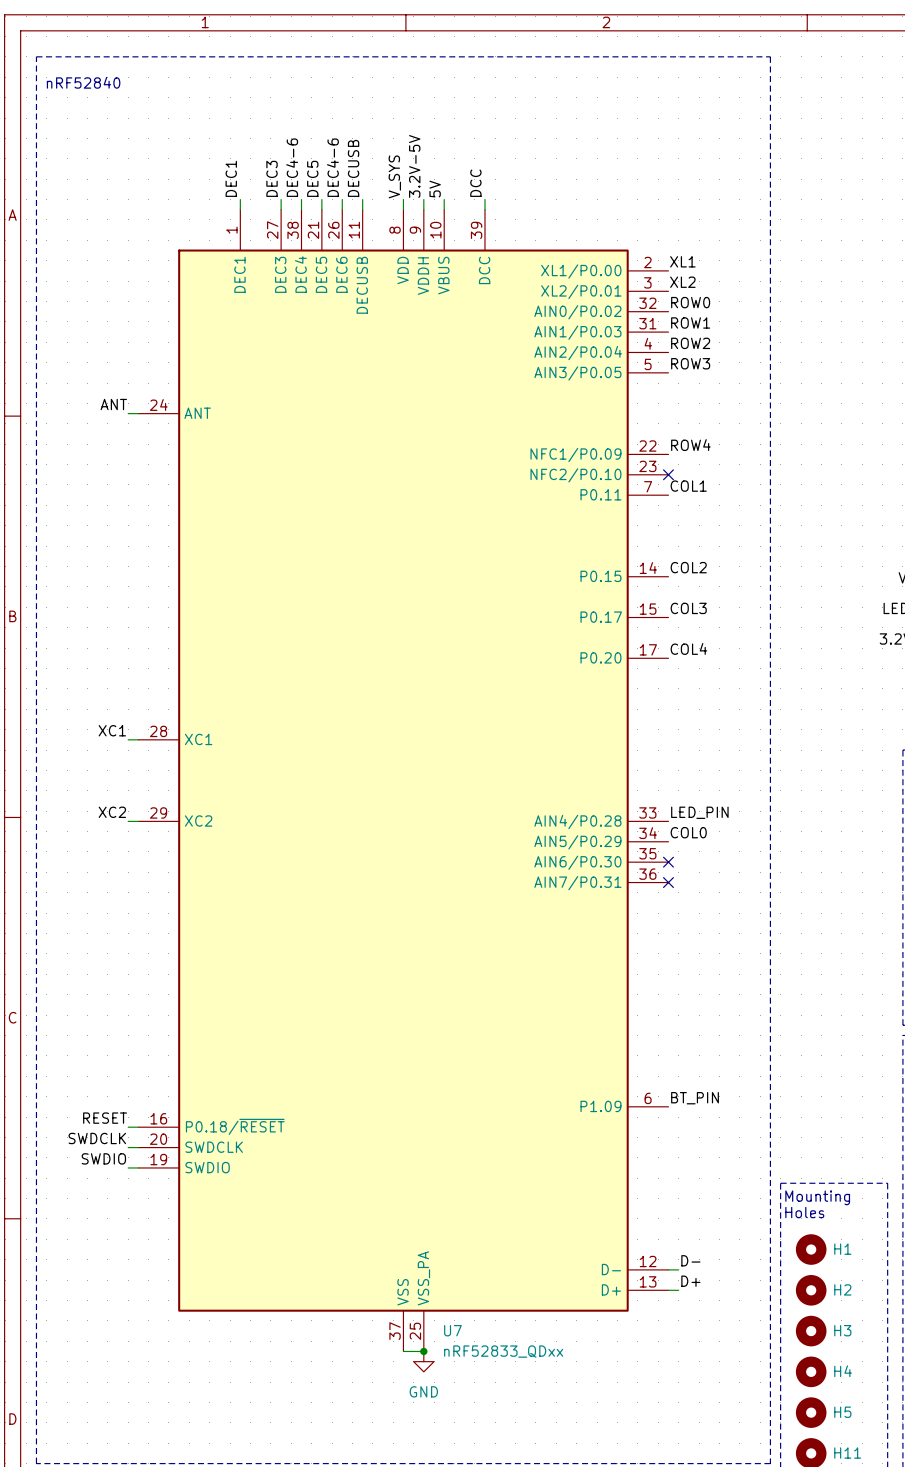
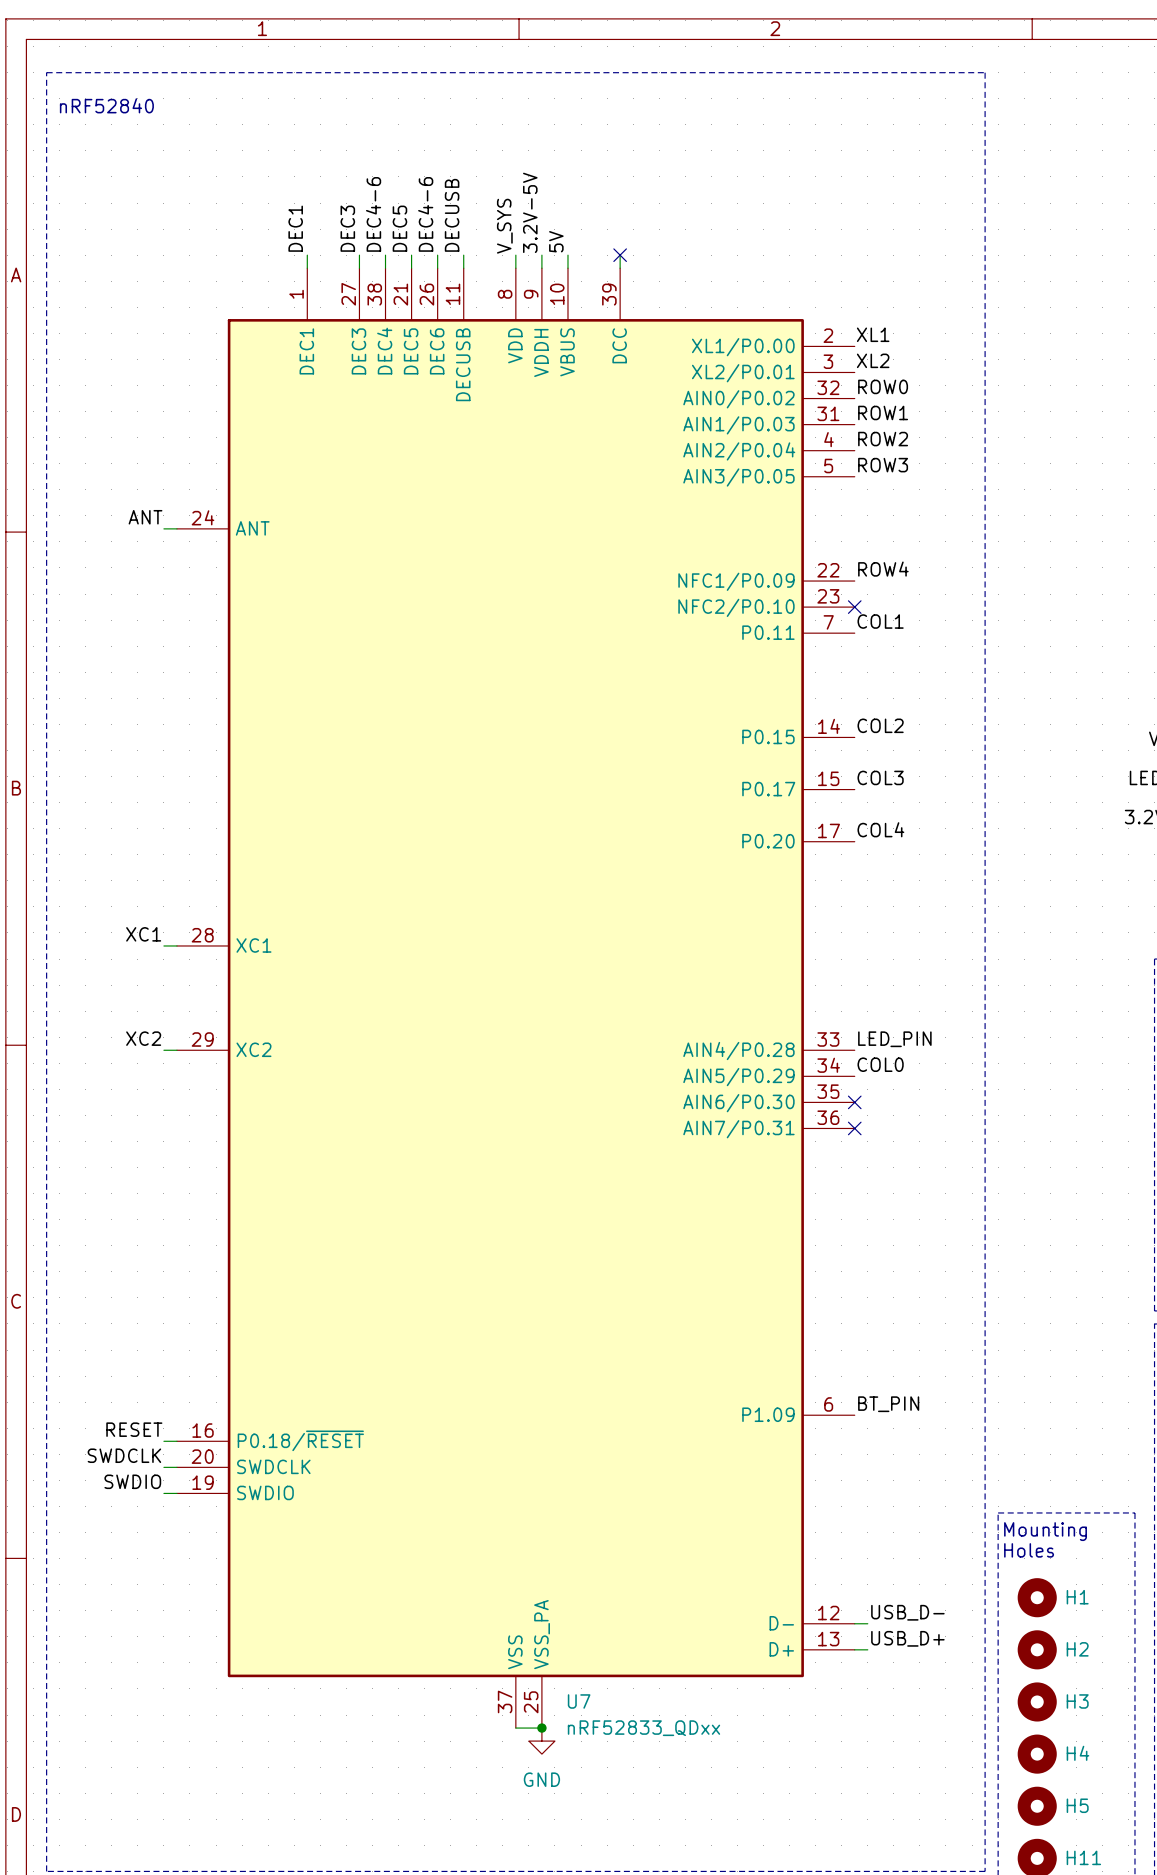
label: DCC (475, 183) -> none
no-connect mark: none -> (620, 255)
label: D- (690, 1260) -> USB_D- (907, 1612)
label: D+ (690, 1281) -> USB_D+ (907, 1638)

